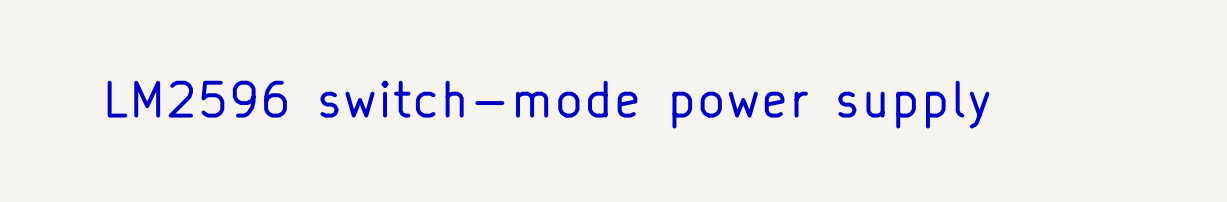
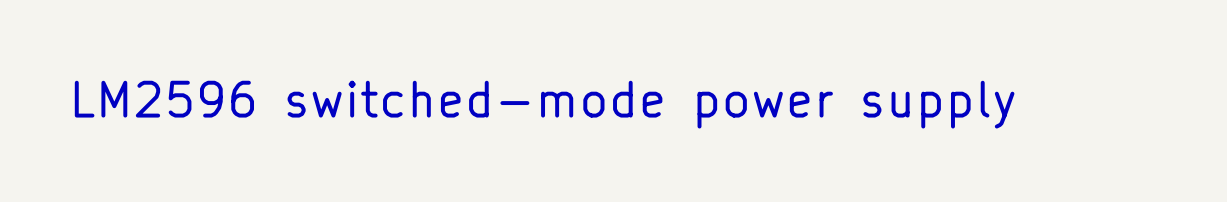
text: LM2596 switch-mode power supply (548, 104) -> LM2596 switched-mode power supply (544, 104)

